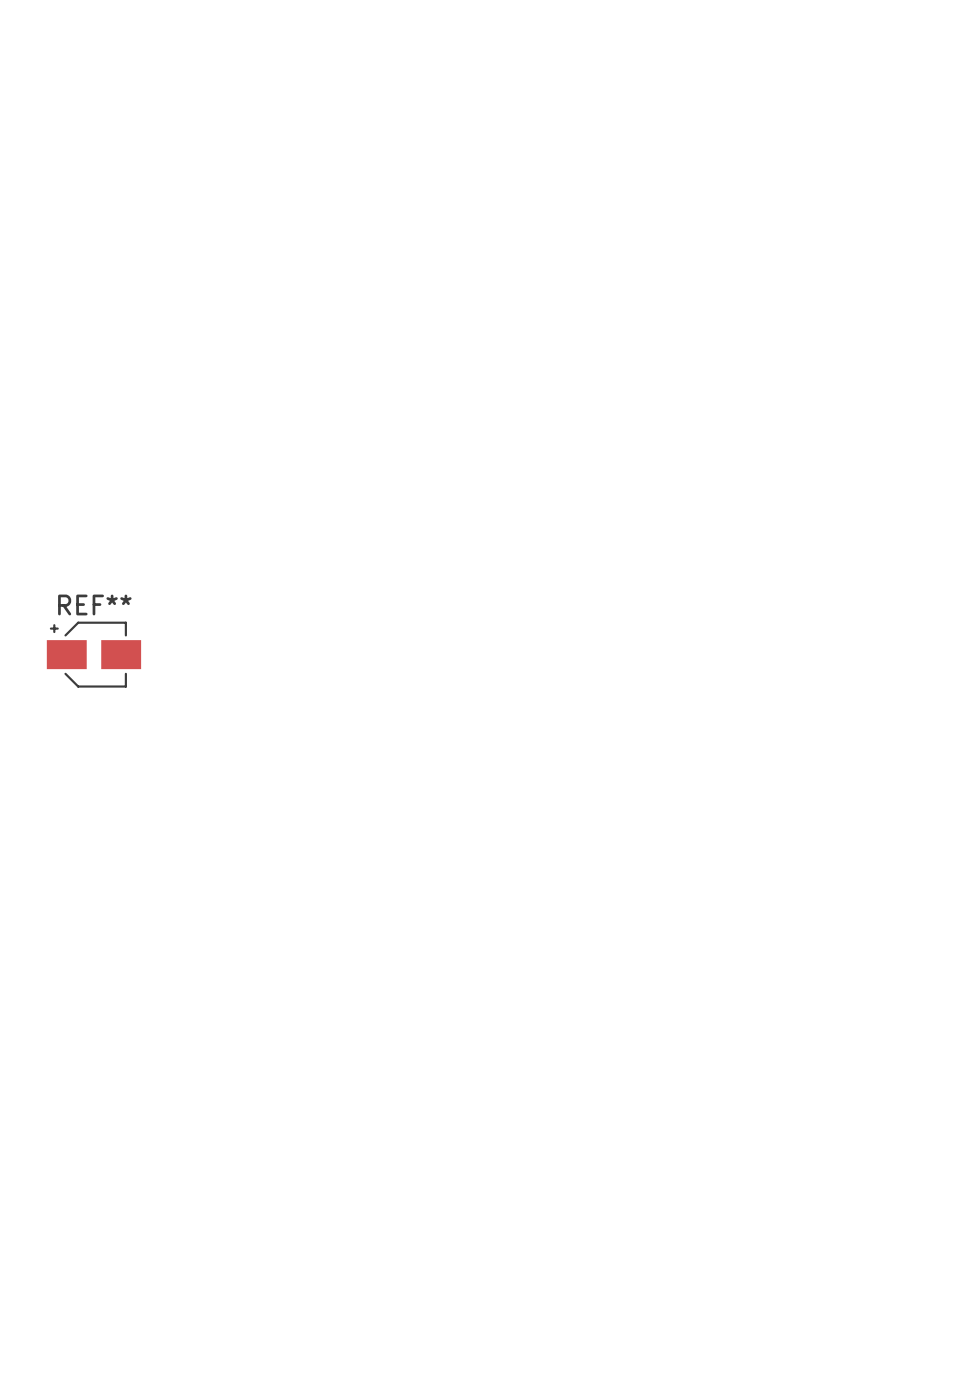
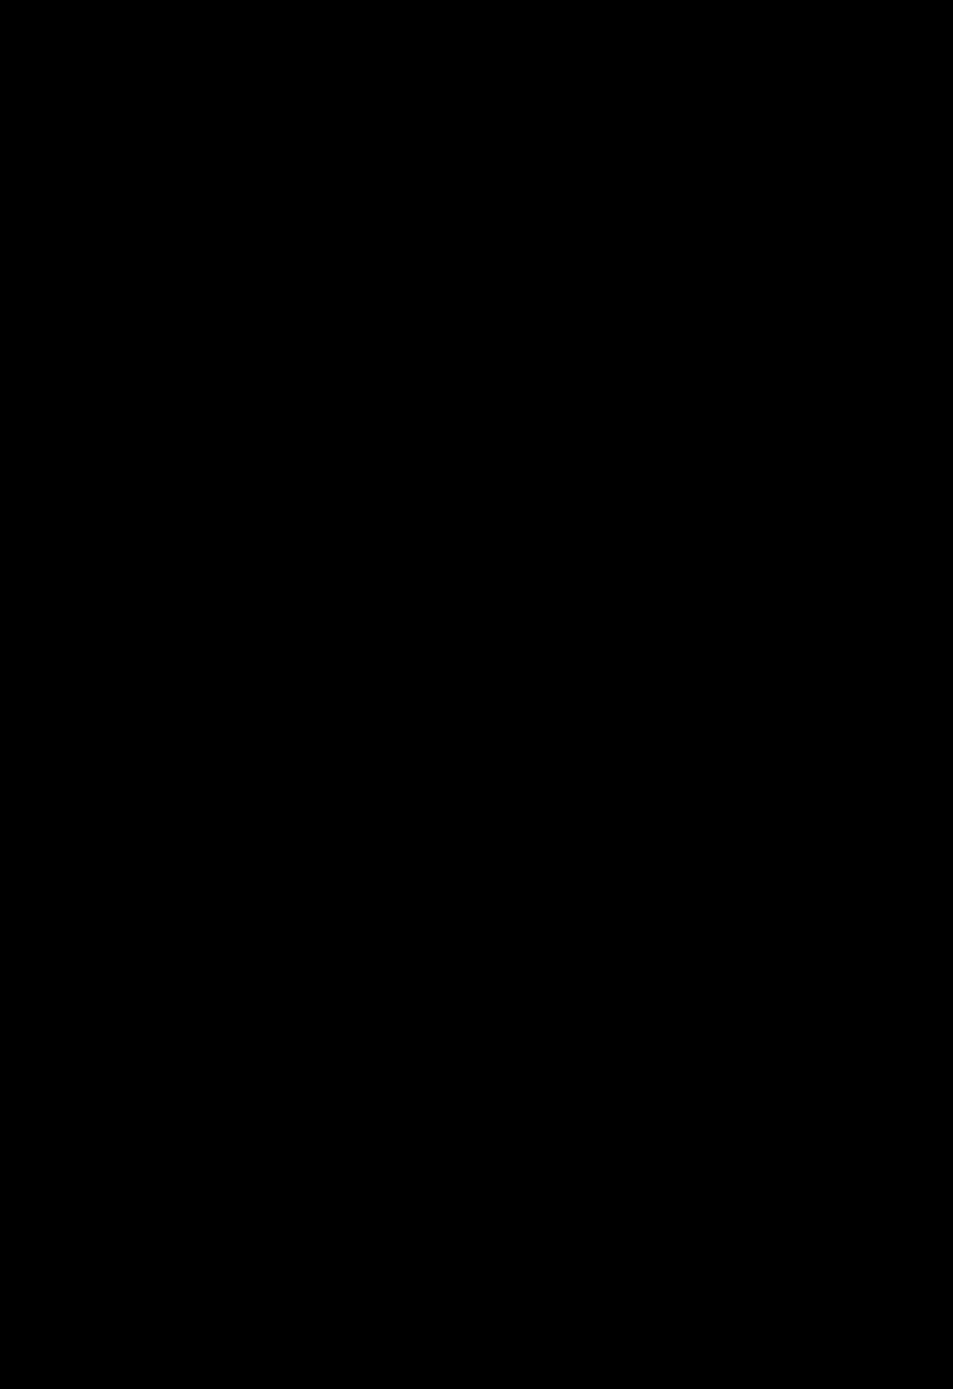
REF**: (93, 654) -> none

